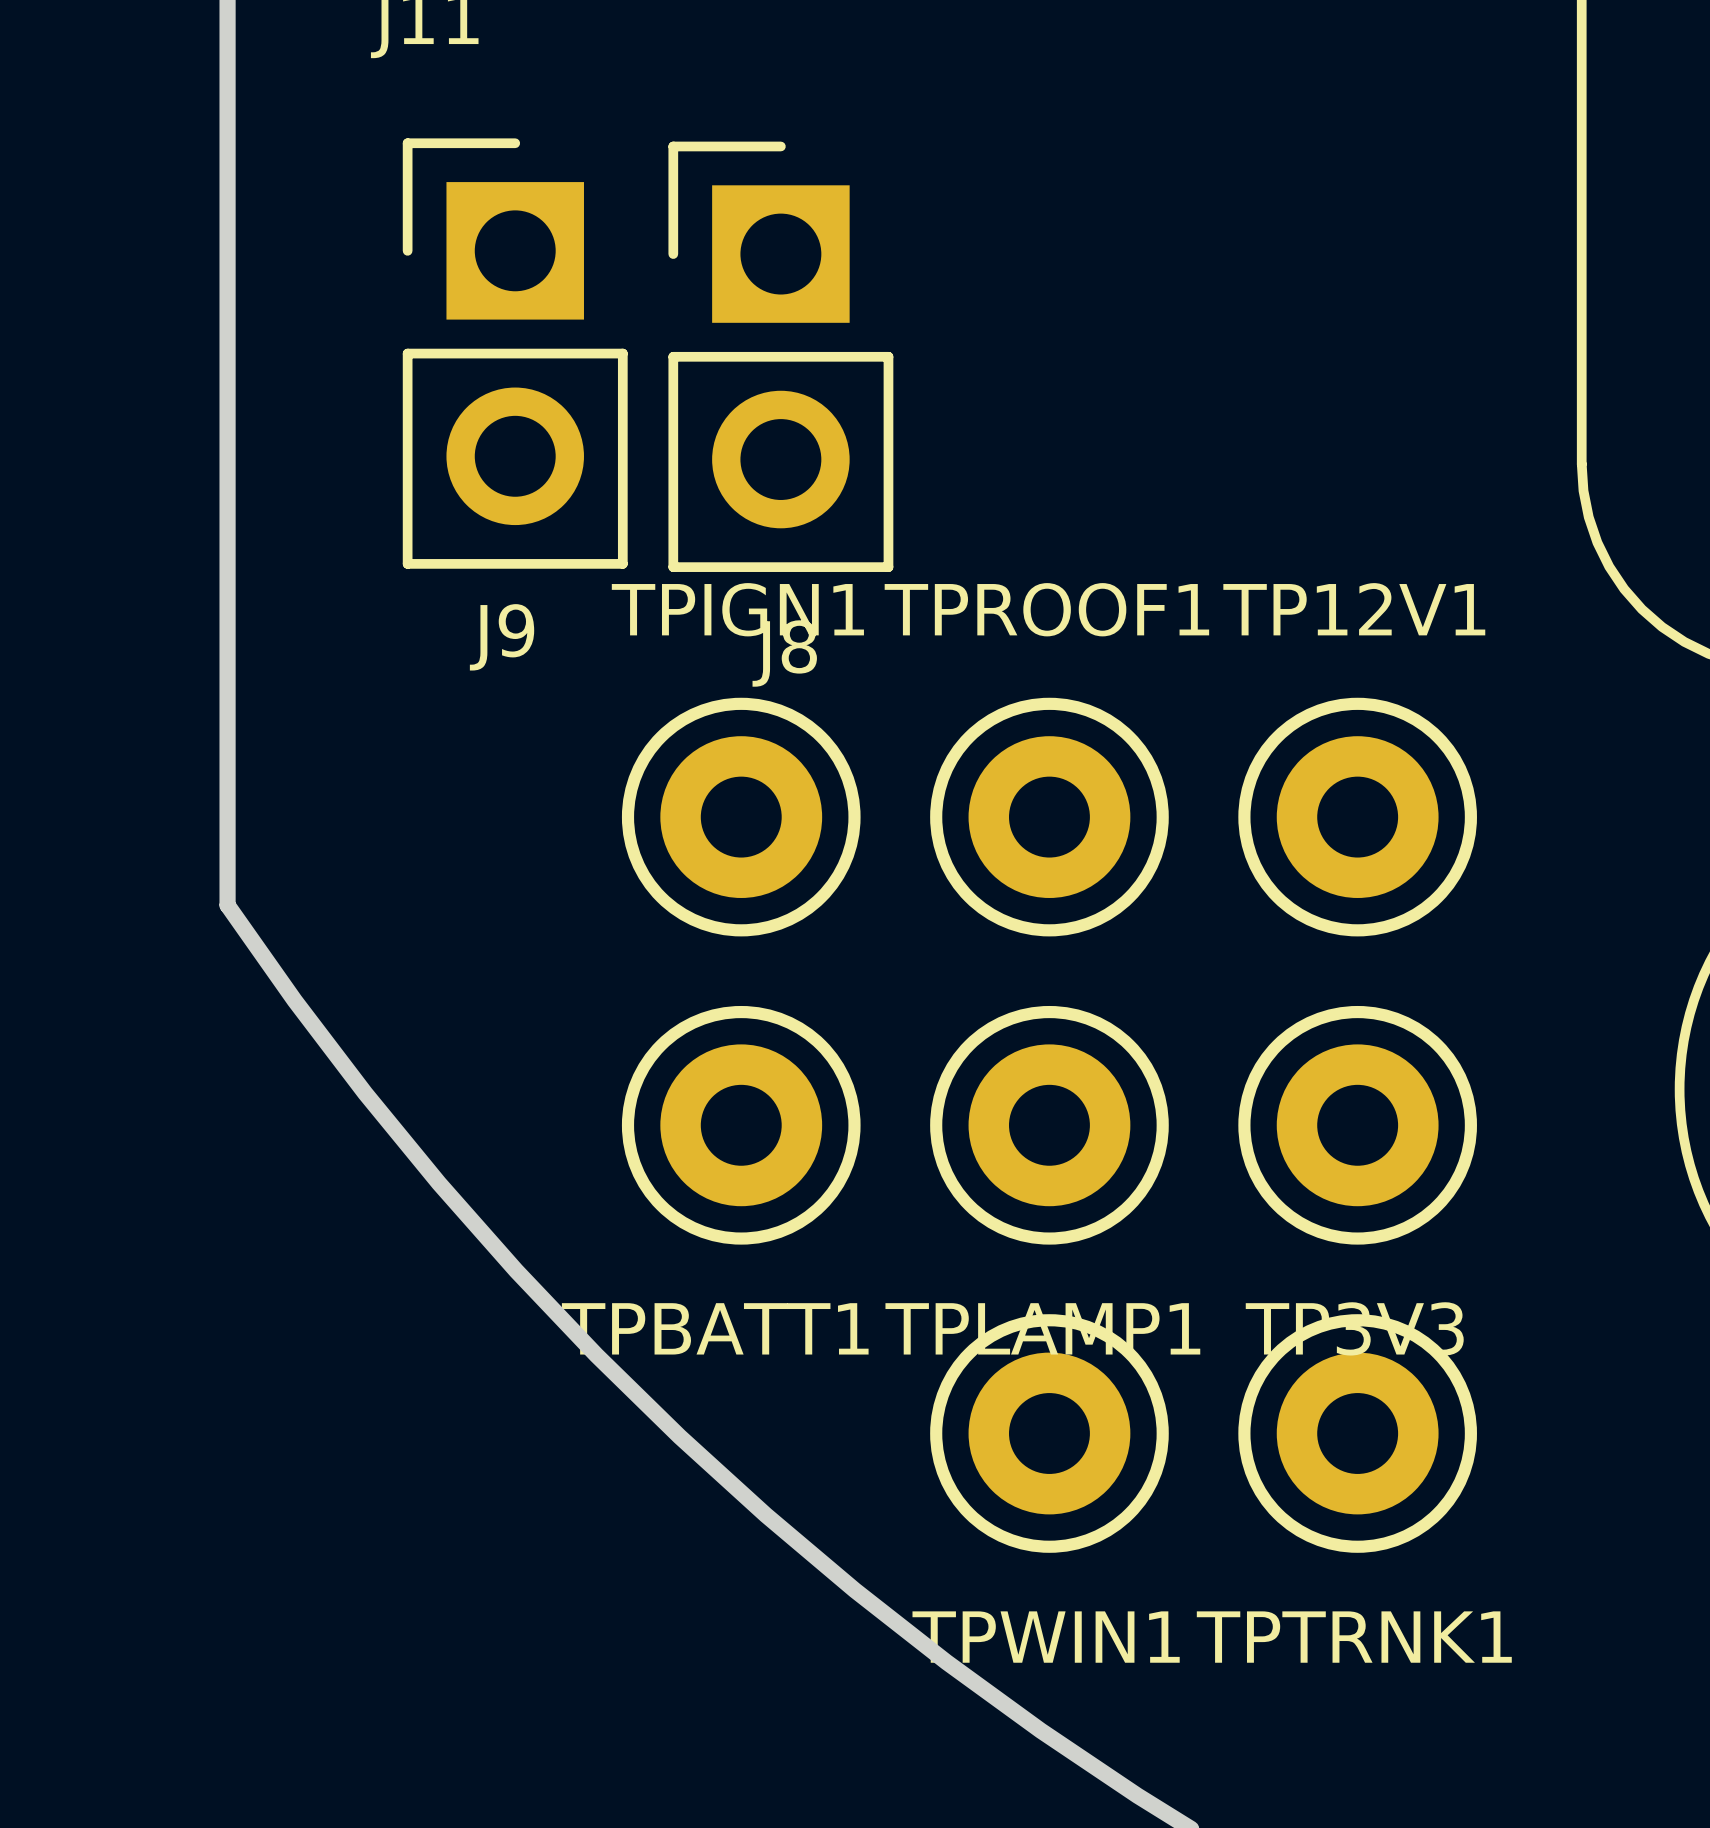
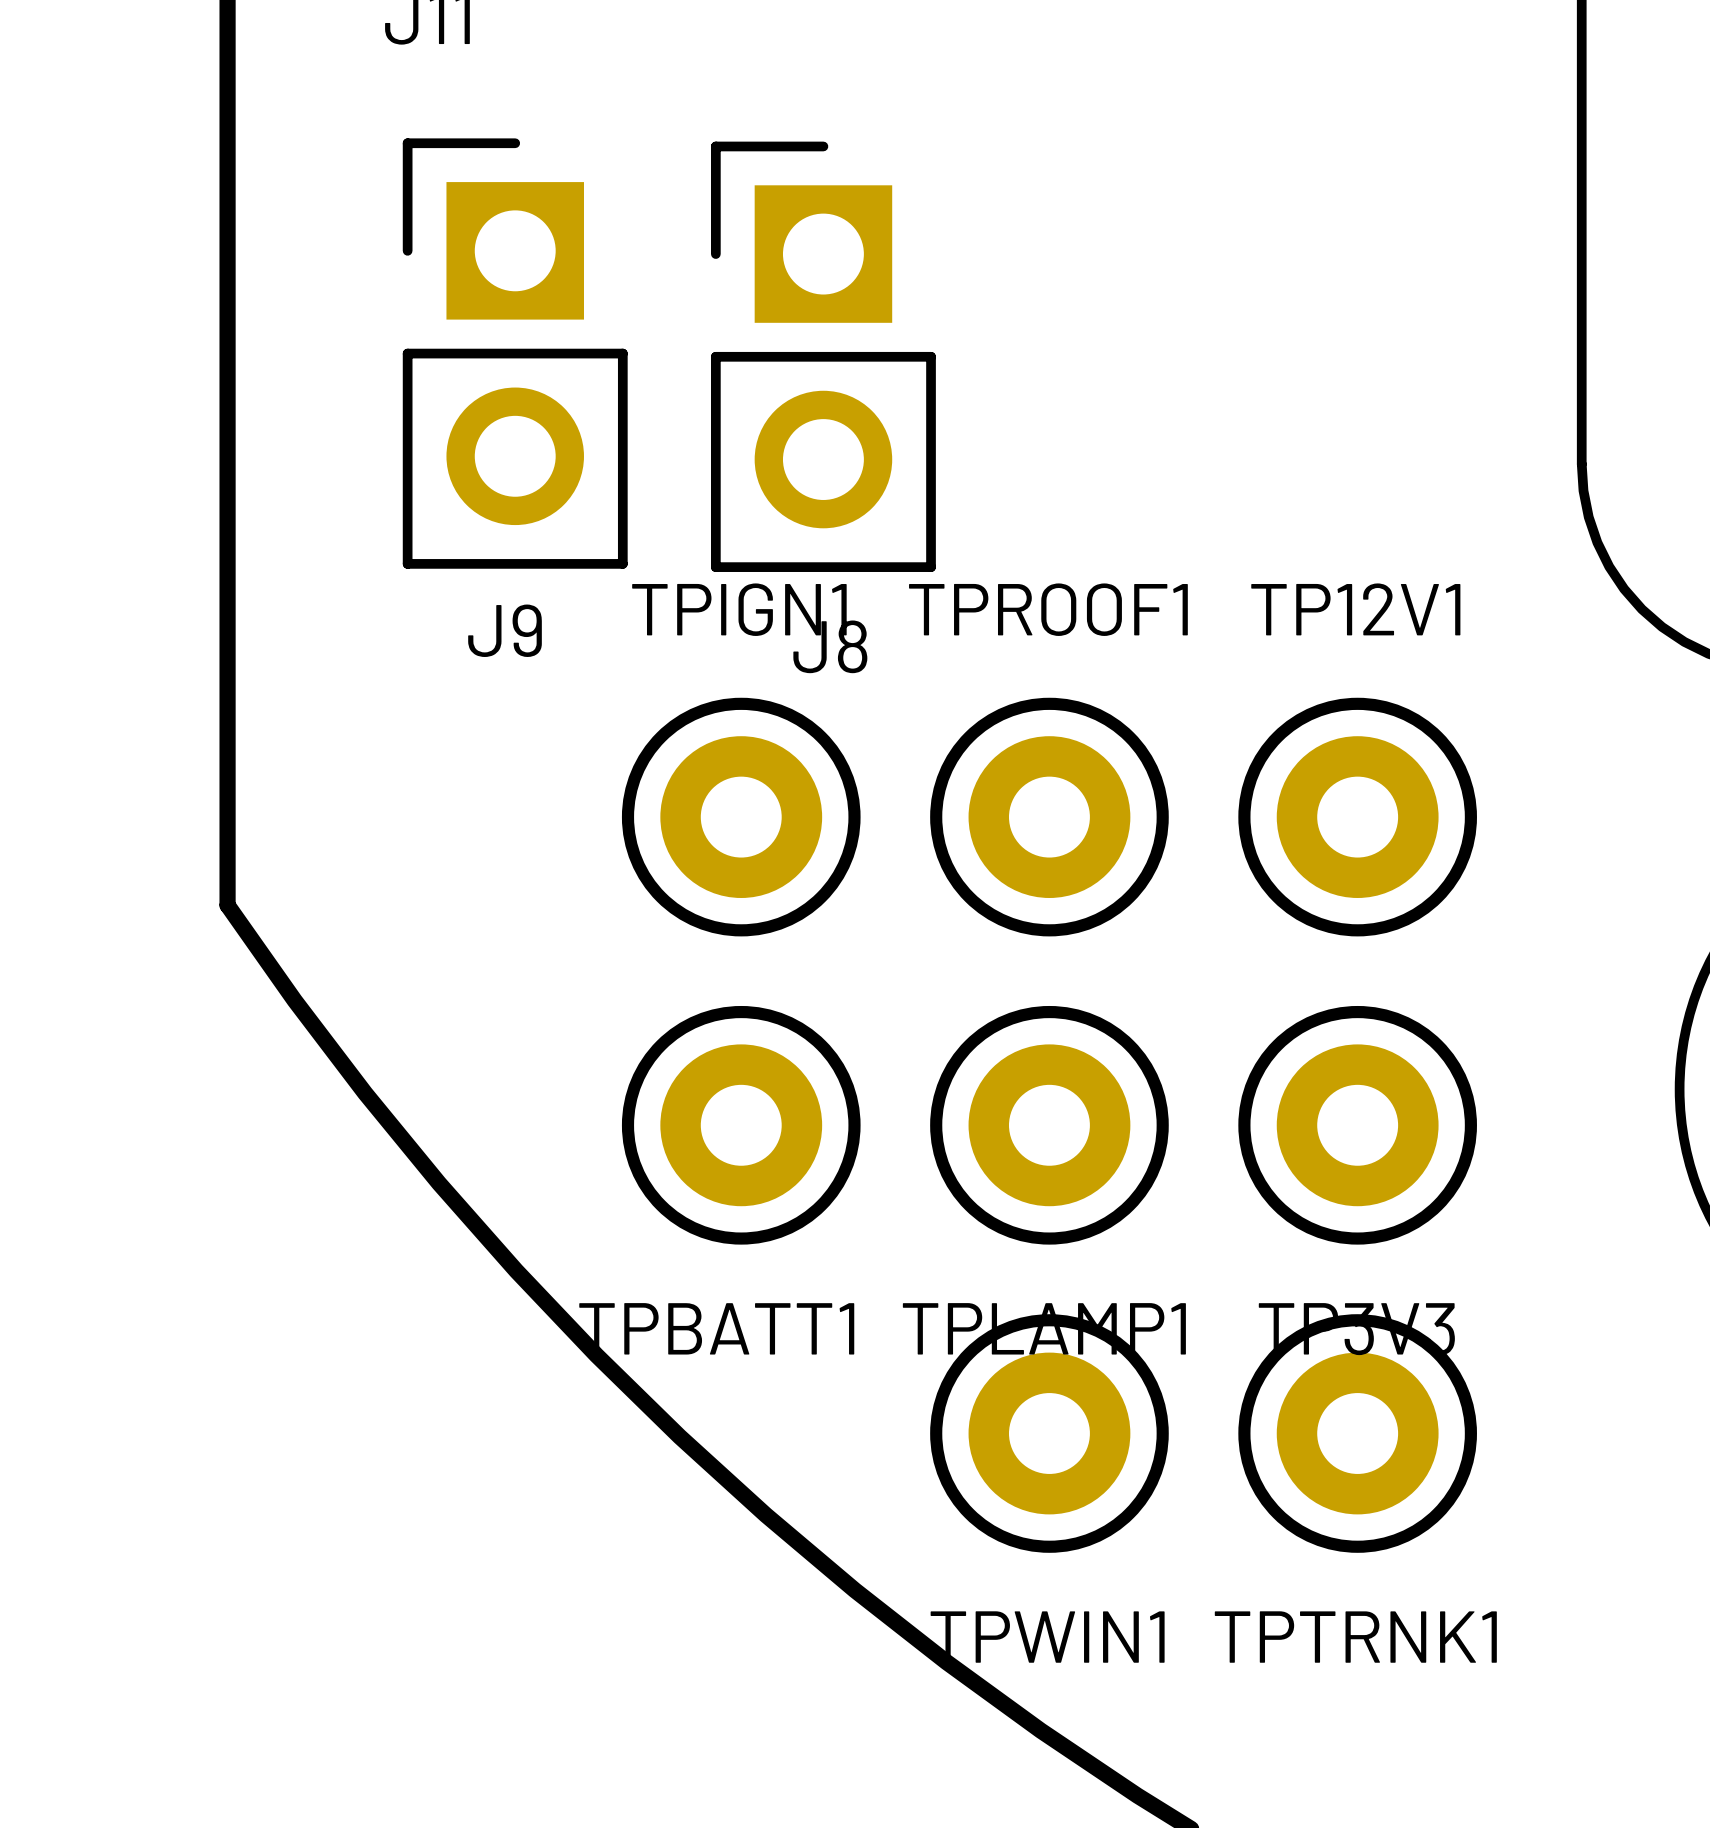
J8 position: (780, 356) -> (823, 356)

